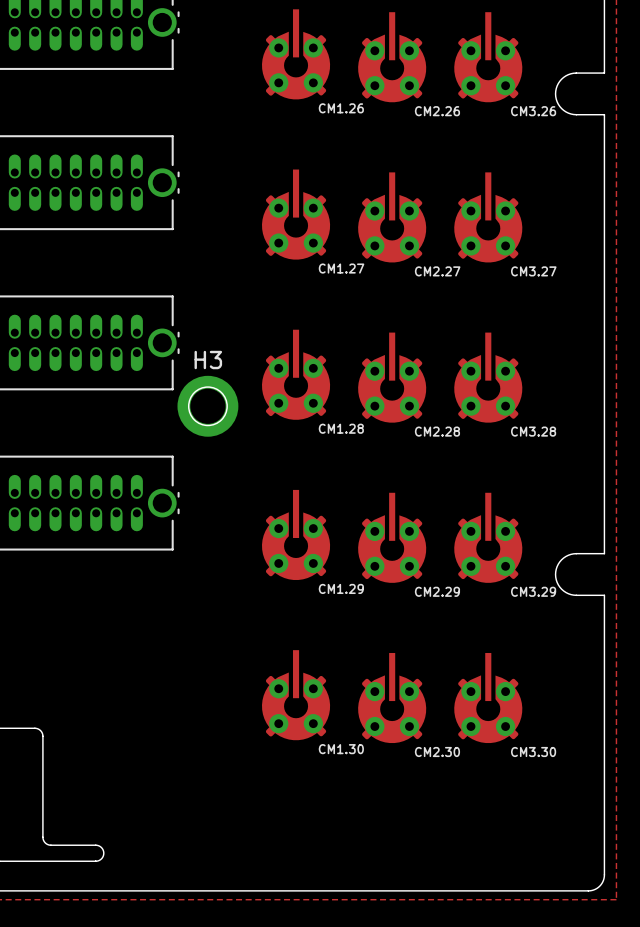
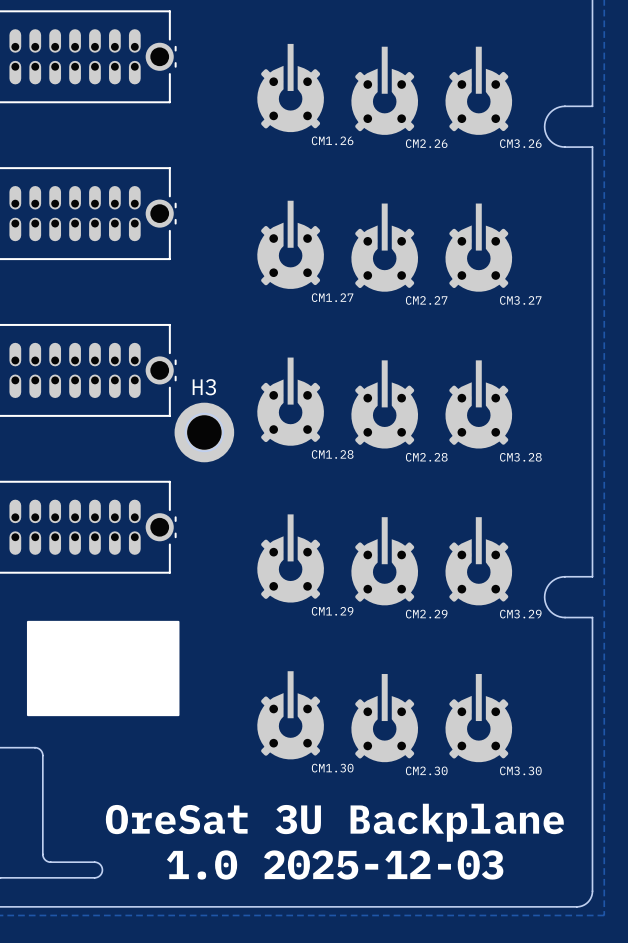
drawing: none -> [26, 620, 180, 717]
text: none -> OreSat 3U Backplane (334, 822)
text: none -> 1.0 2025-12-03 (335, 864)

